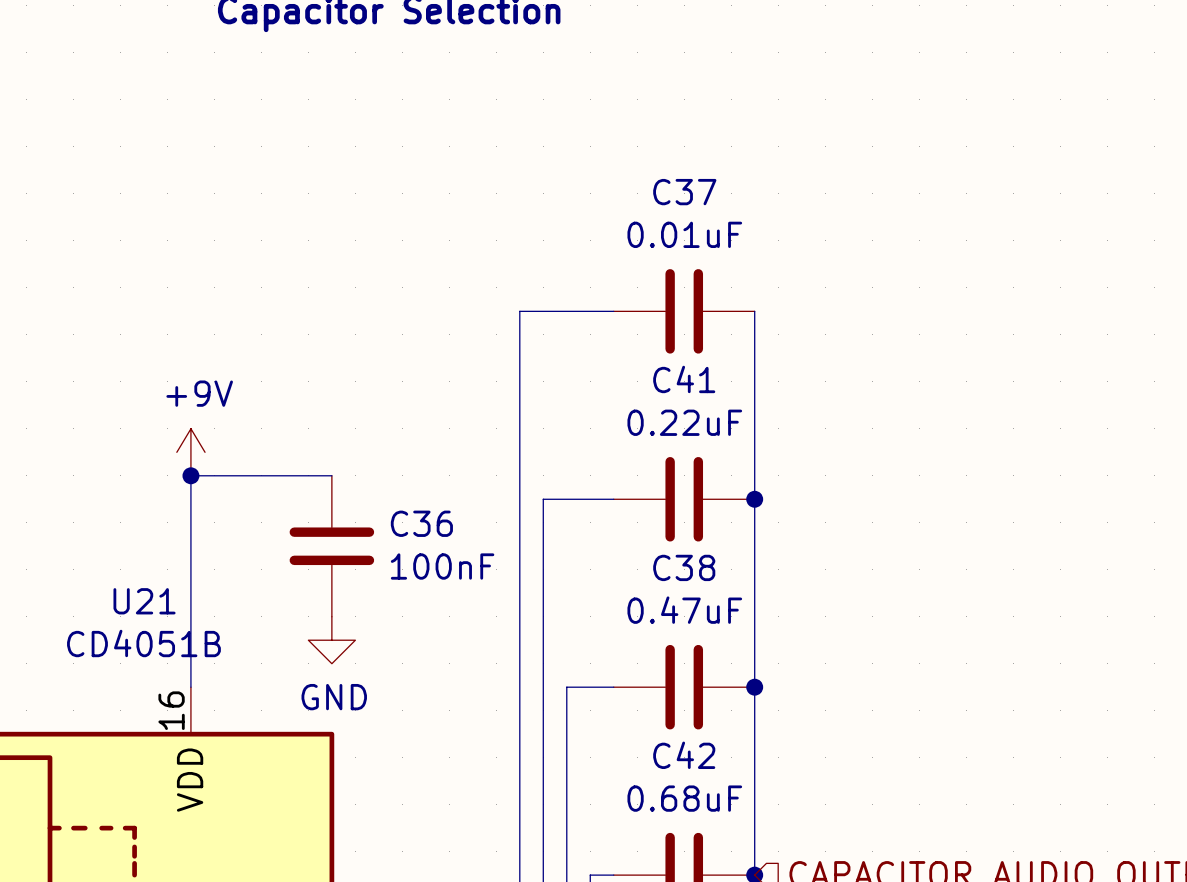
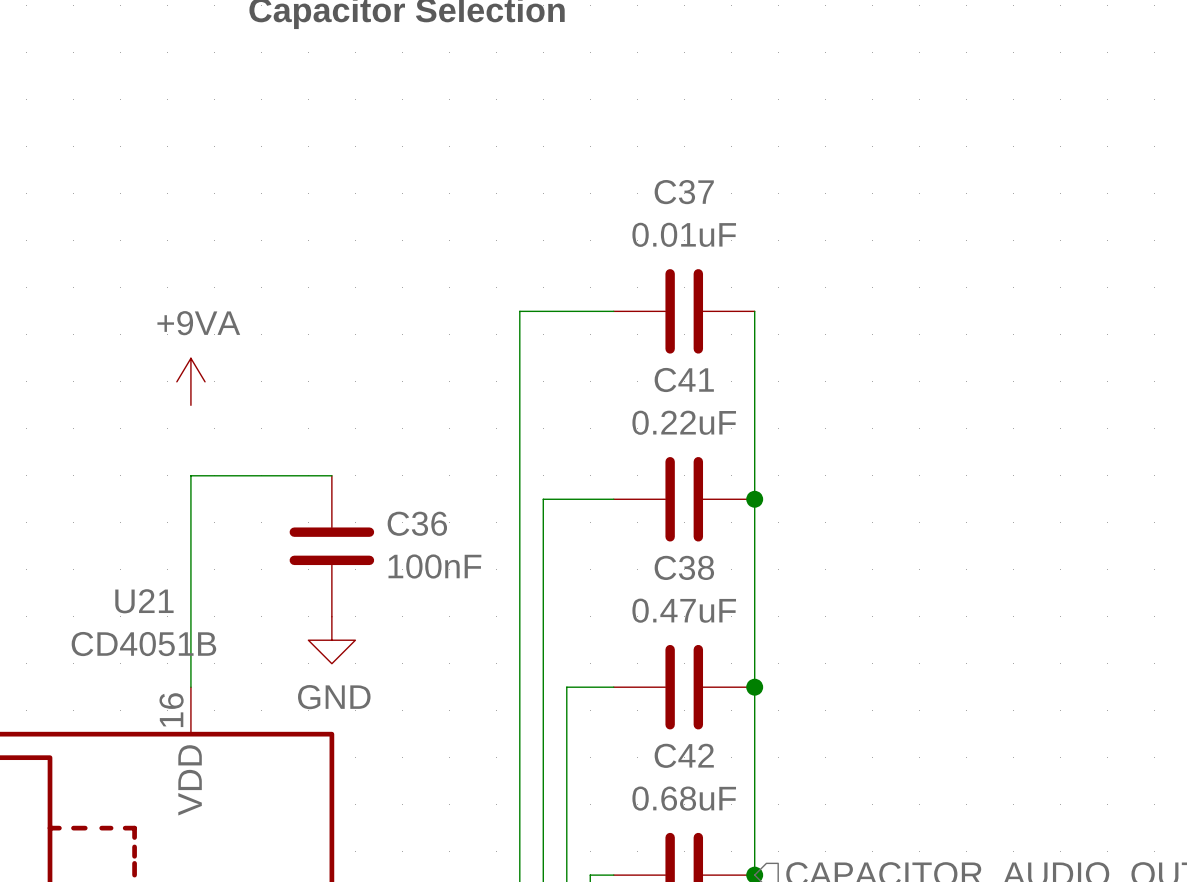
power symbol: none -> +9VA (190, 381)
power symbol: +9V (190, 452) -> none
junction: (190, 475) -> none

